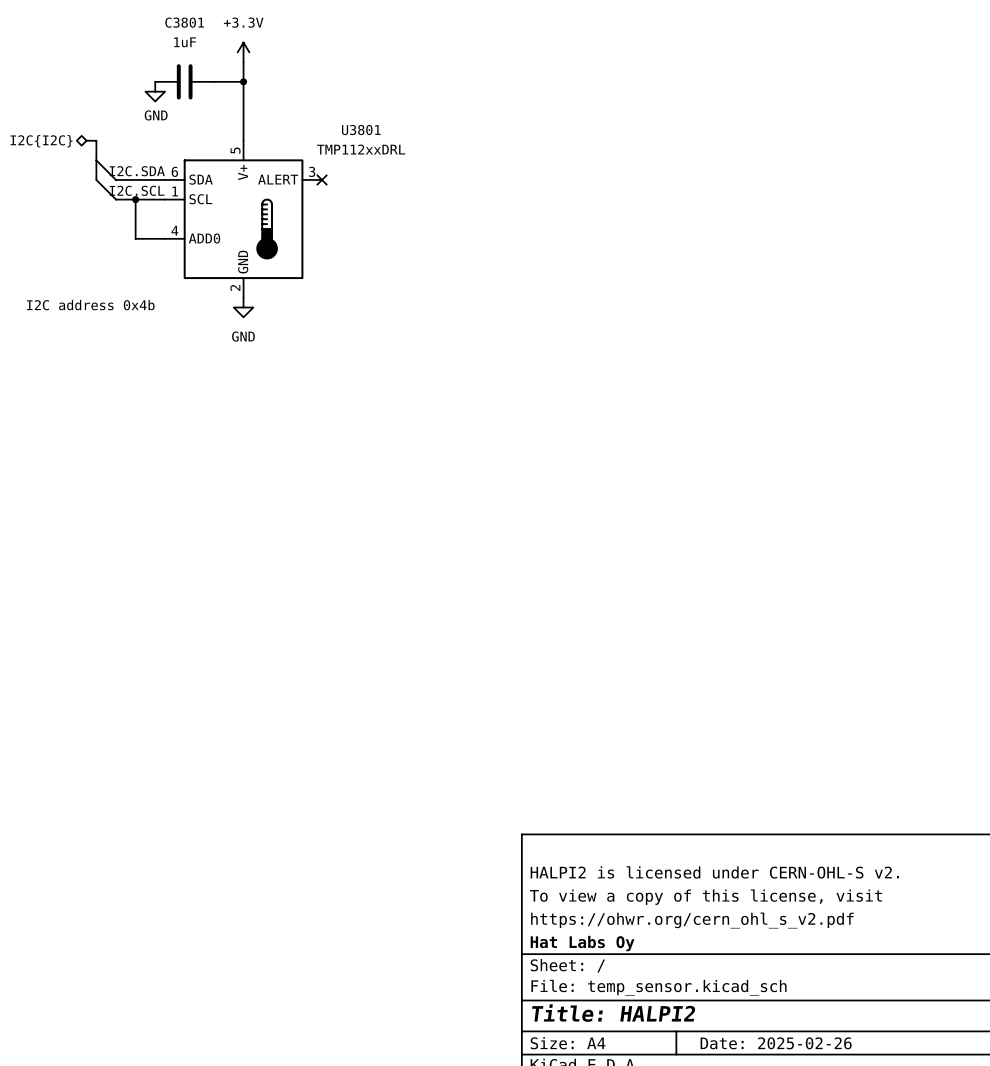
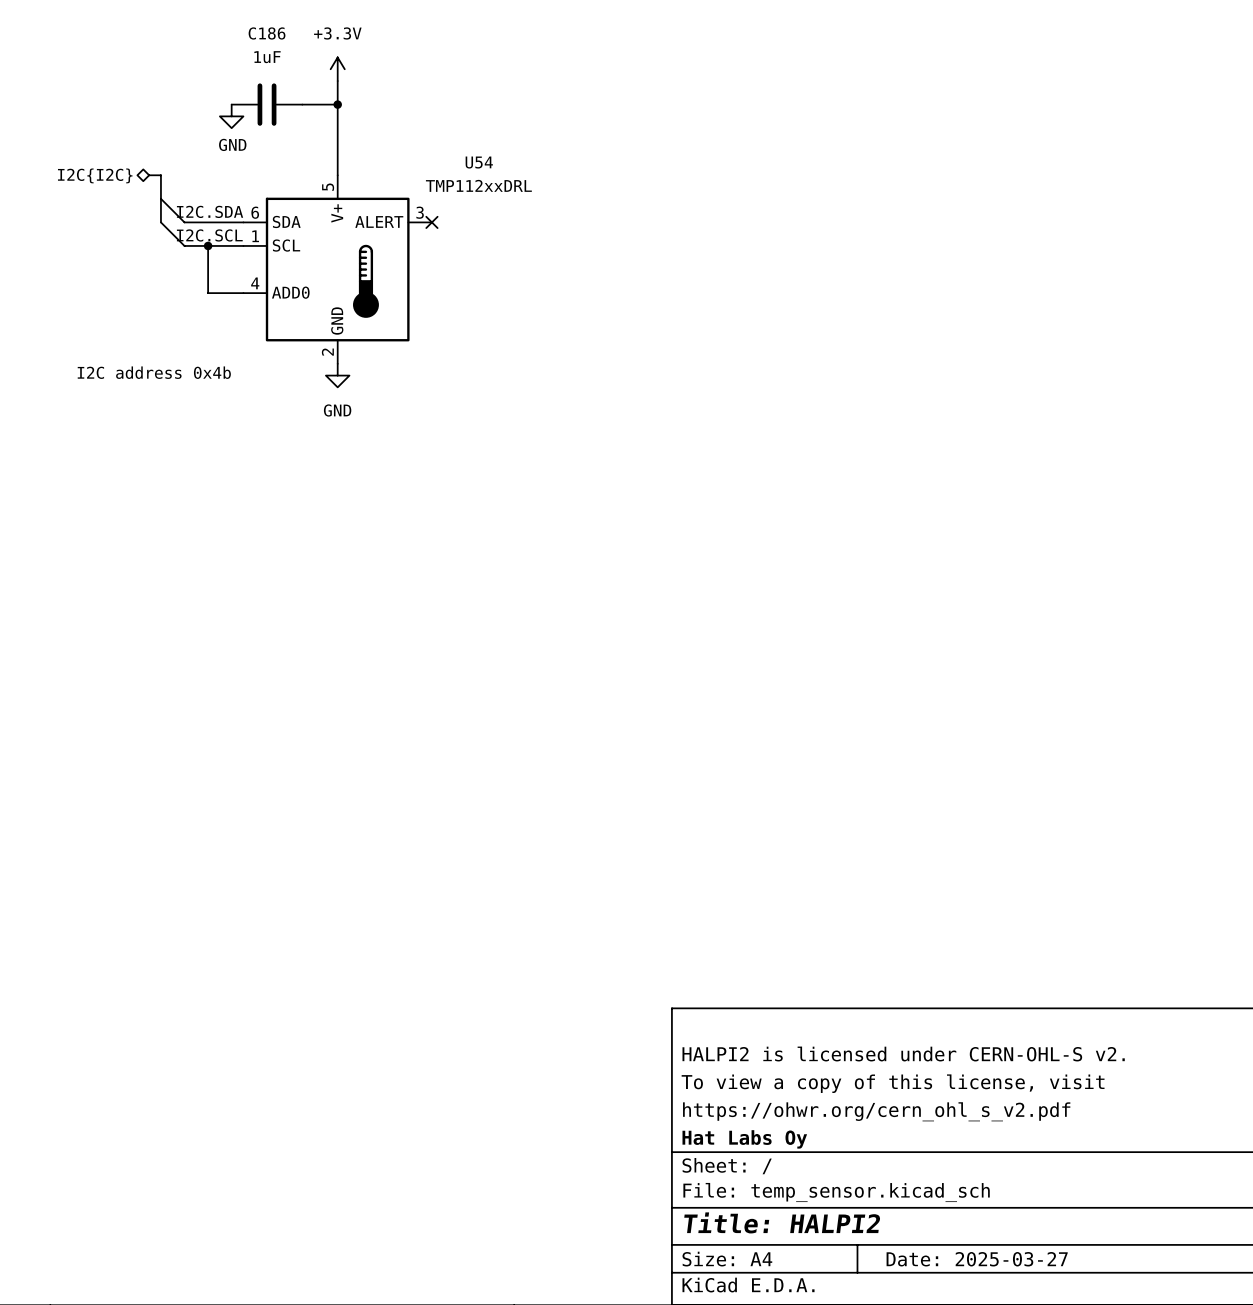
C3801 name: C3801 (184, 22) -> C186 (267, 33)
U3801 name: U3801 (361, 130) -> U54 (479, 162)
title block: Date: 2025-02-26 (776, 1043) -> Date: 2025-03-27 (977, 1259)

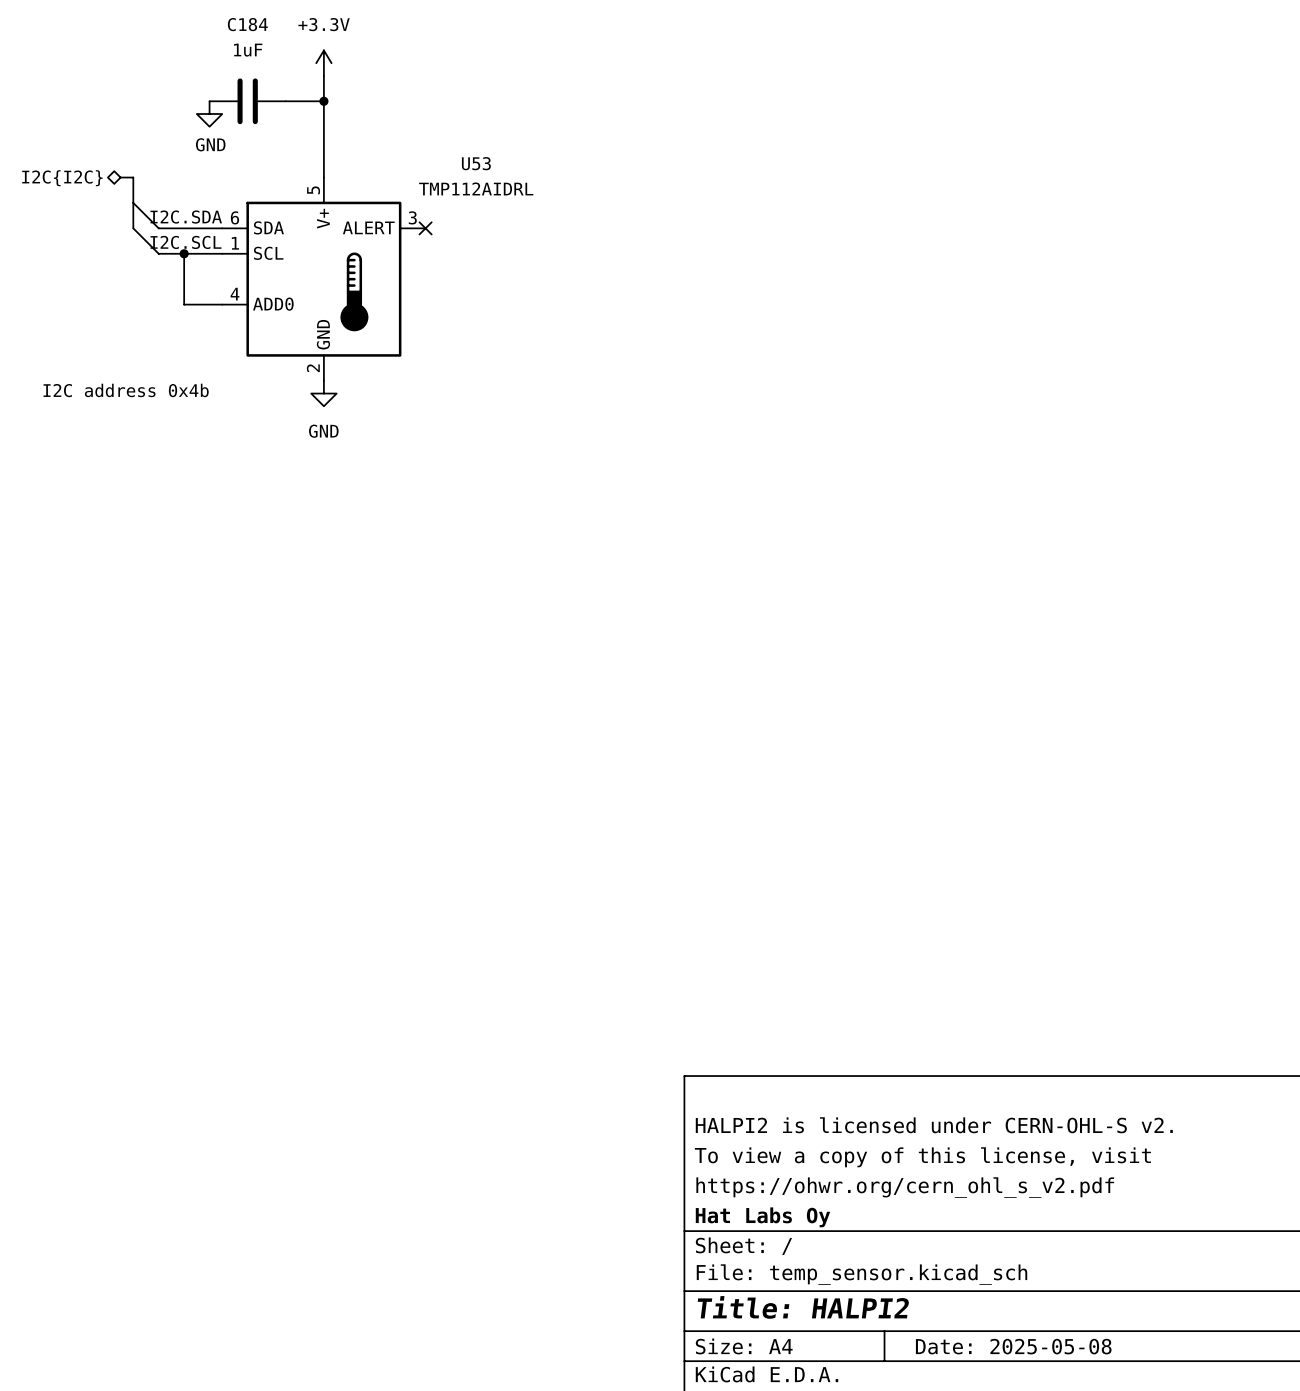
C186 name: C186 (267, 33) -> C184 (247, 24)
U54 name: U54 (479, 162) -> U53 (476, 163)
U54 value: TMP112xxDRL (478, 185) -> TMP112AIDRL (476, 188)
title block: Date: 2025-03-27 (977, 1259) -> Date: 2025-05-08 (1013, 1346)

